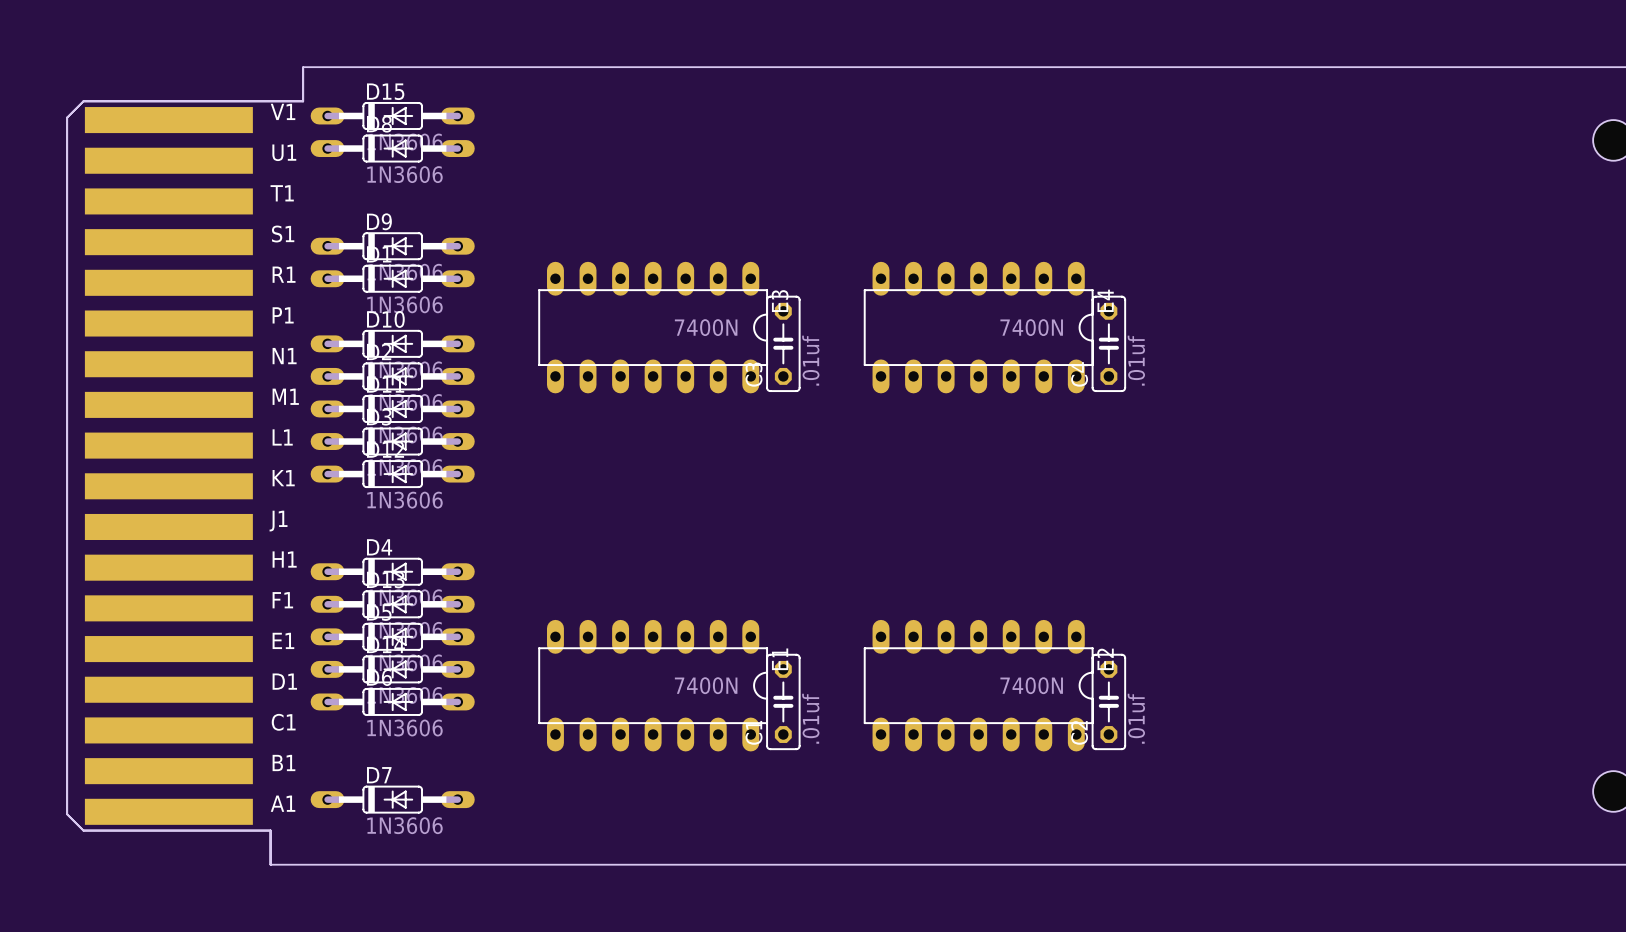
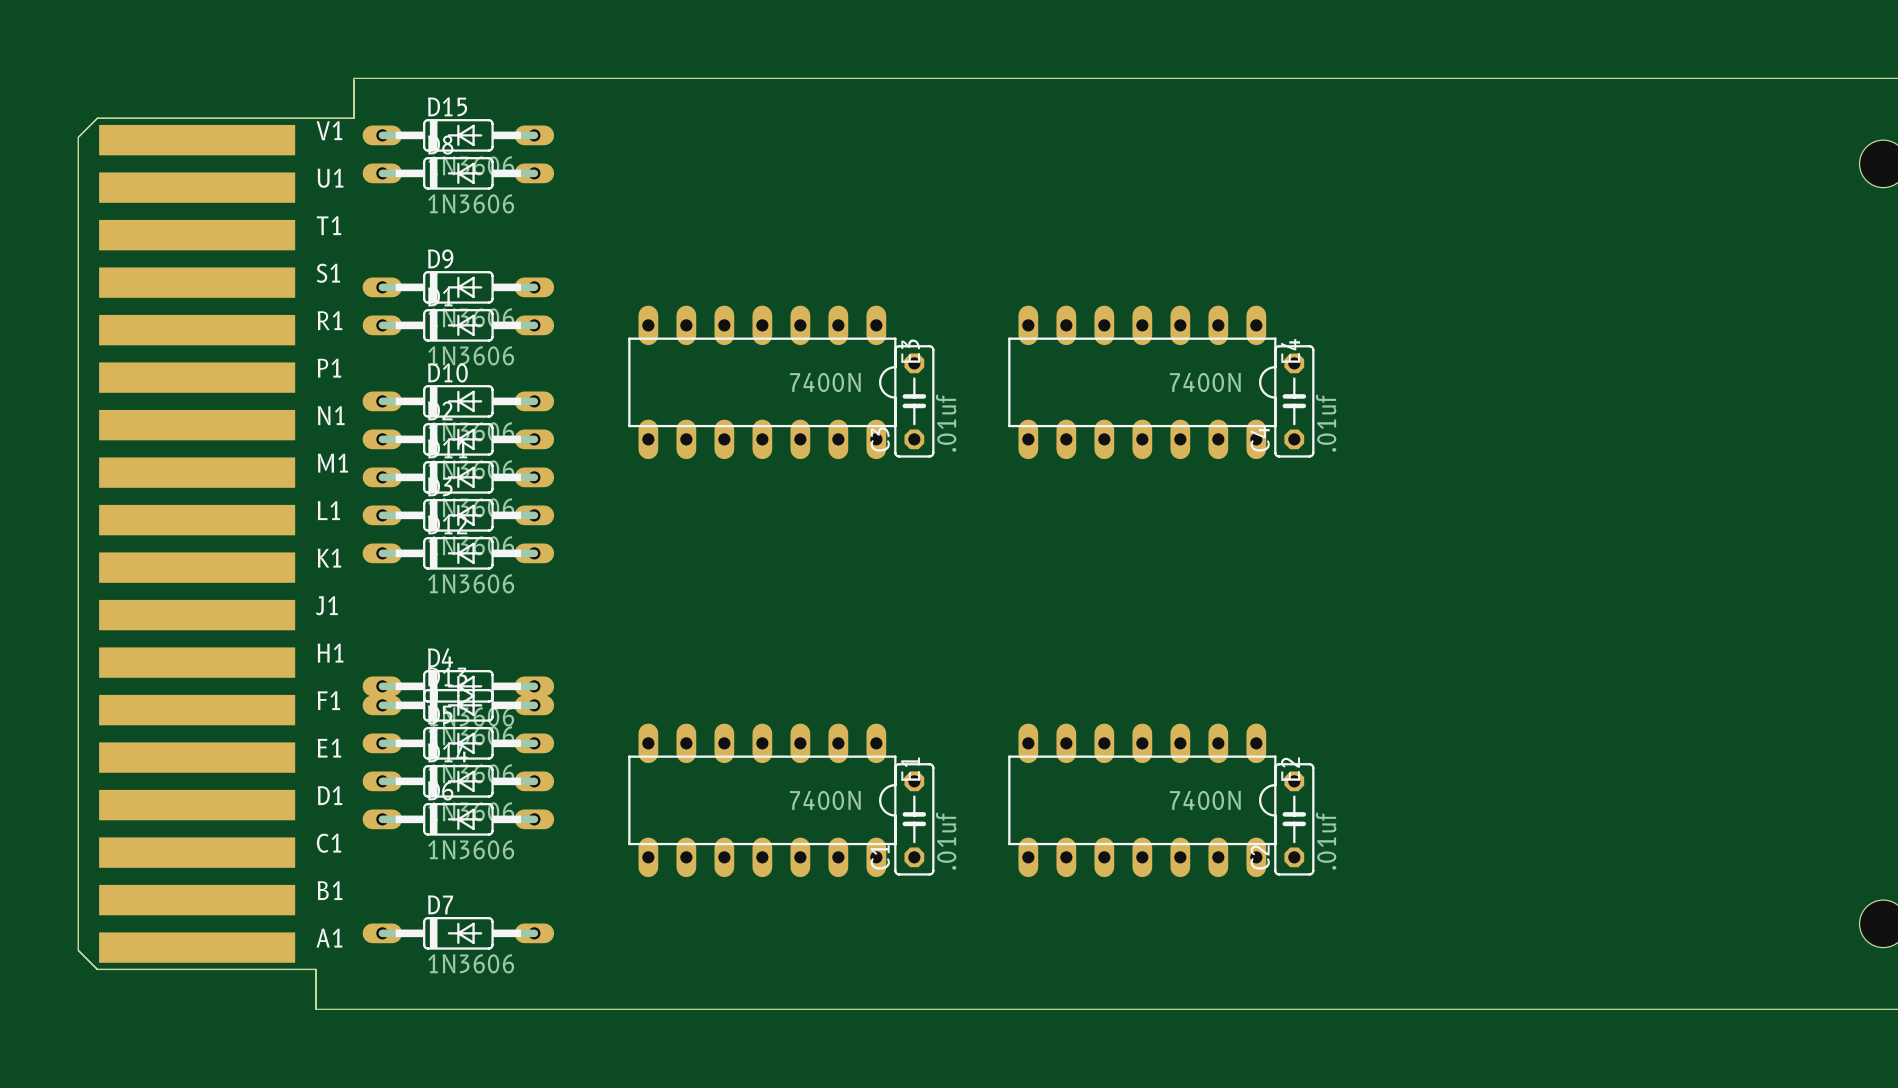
D4 position: (392, 571) -> (458, 686)

